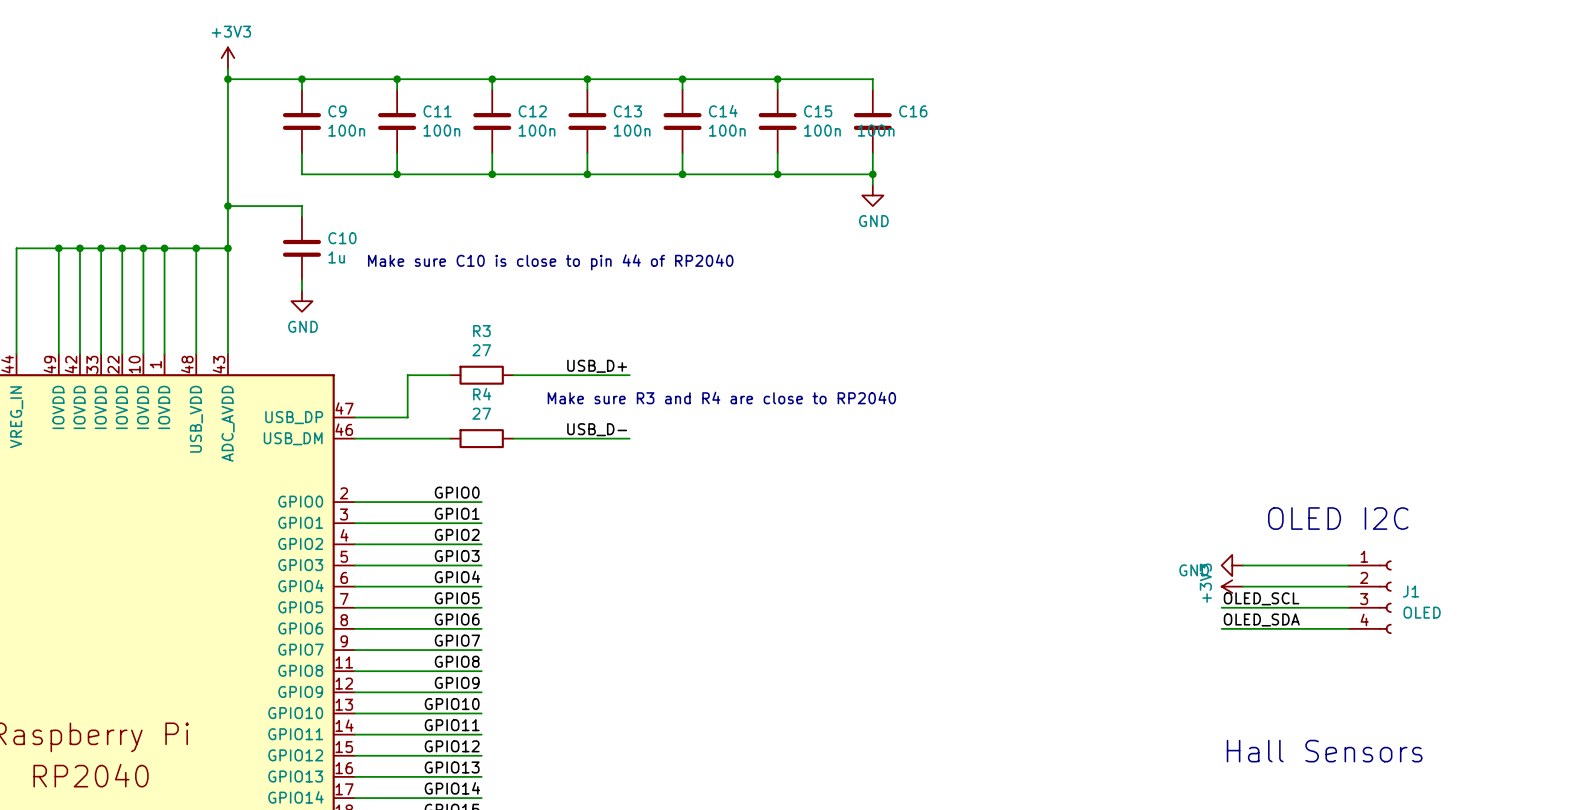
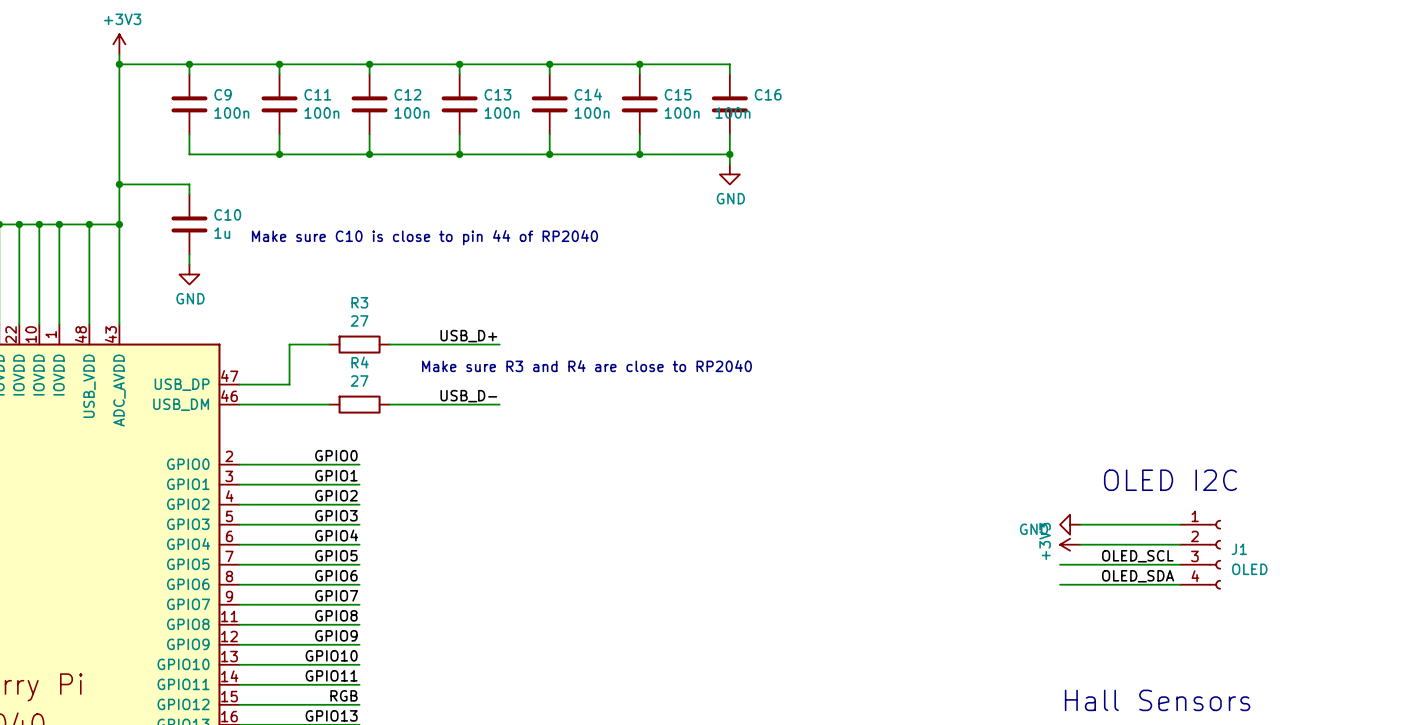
label position: OLED_SCL (1261, 598) -> OLED_SCL (1137, 556)
label position: OLED_SDA (1261, 619) -> OLED_SDA (1138, 576)
label: GPIO12 (452, 746) -> RGB (344, 695)

